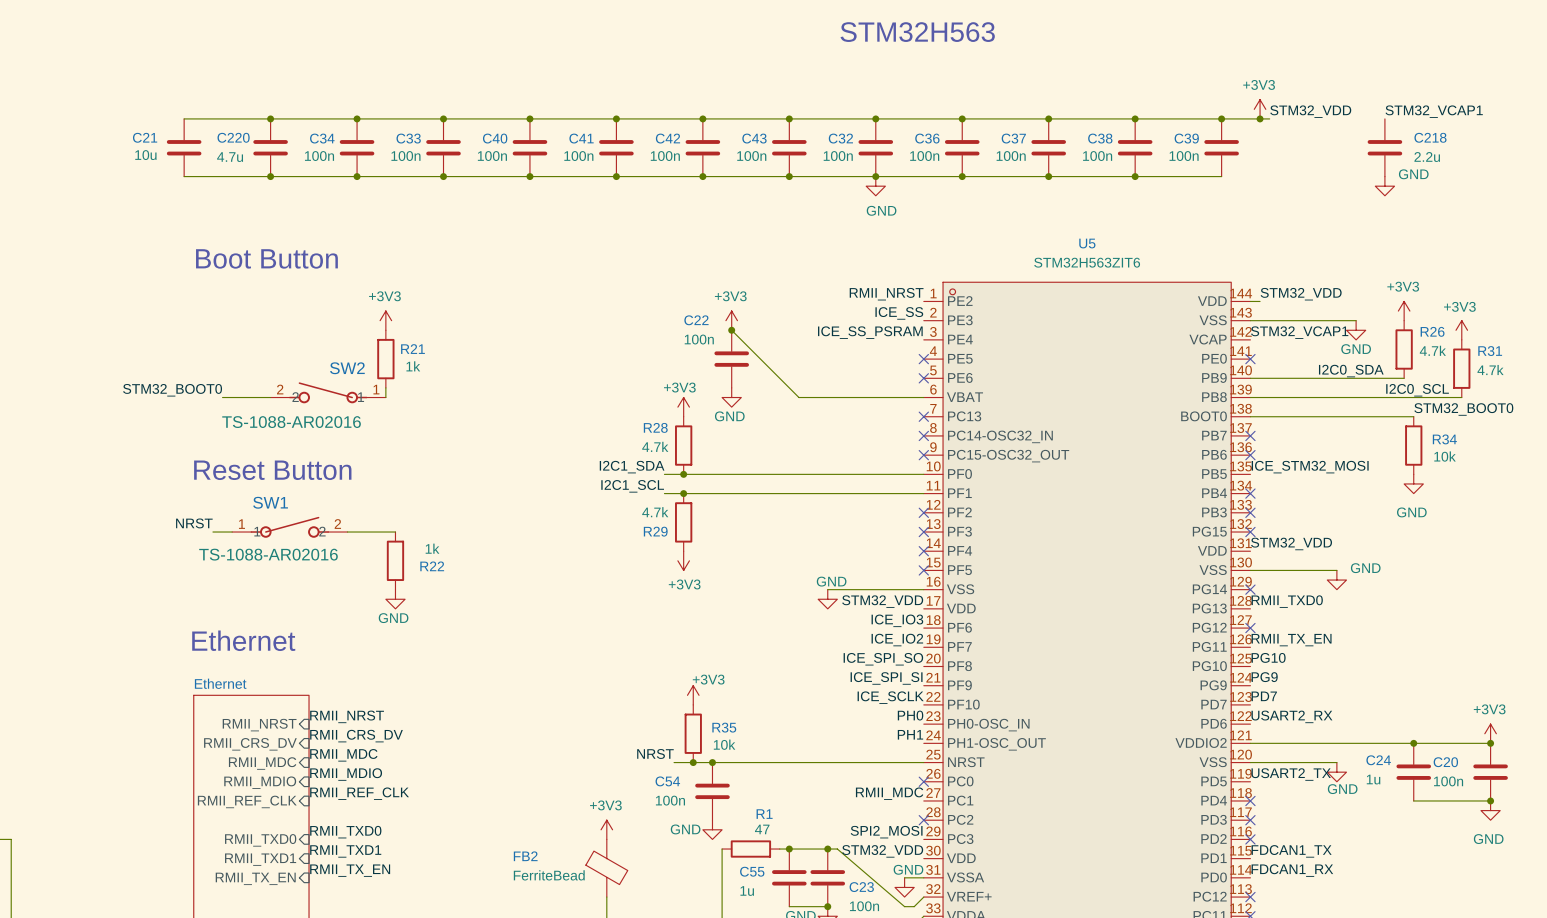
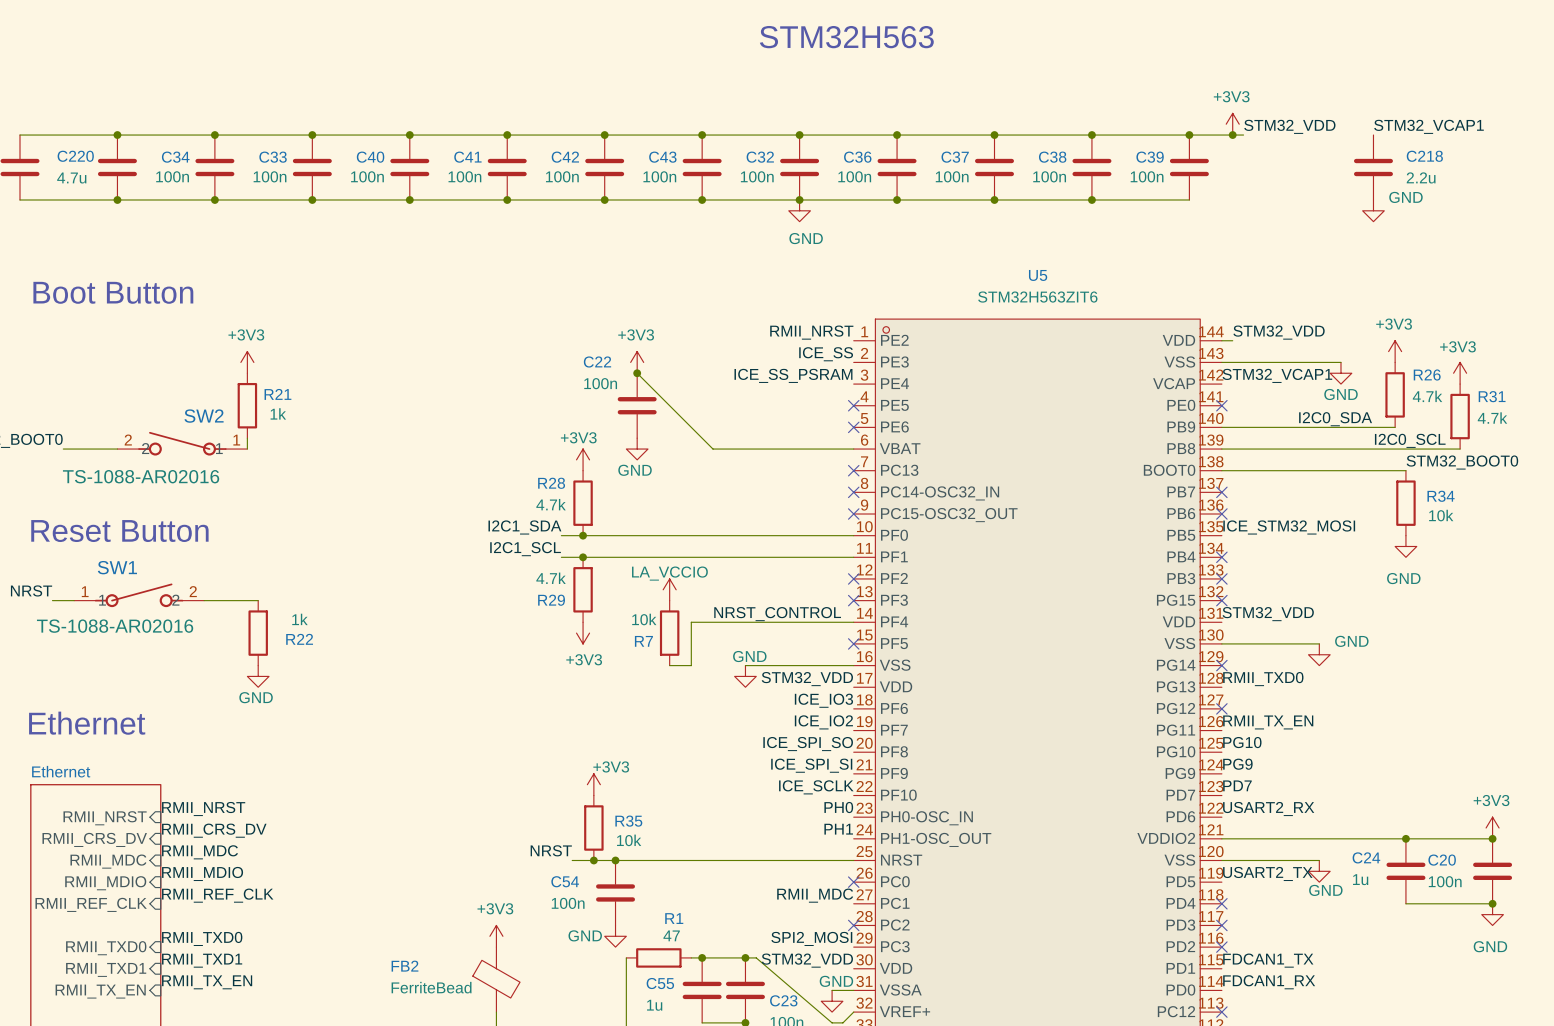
power symbol: none -> LA_VCCIO (669, 589)
label: none -> NRST_CONTROL (777, 614)
wire: none -> (853, 622) (691, 622) (691, 665) (669, 665)
no-connect mark: (923, 551) -> none
R7: none -> 10k (669, 633)

